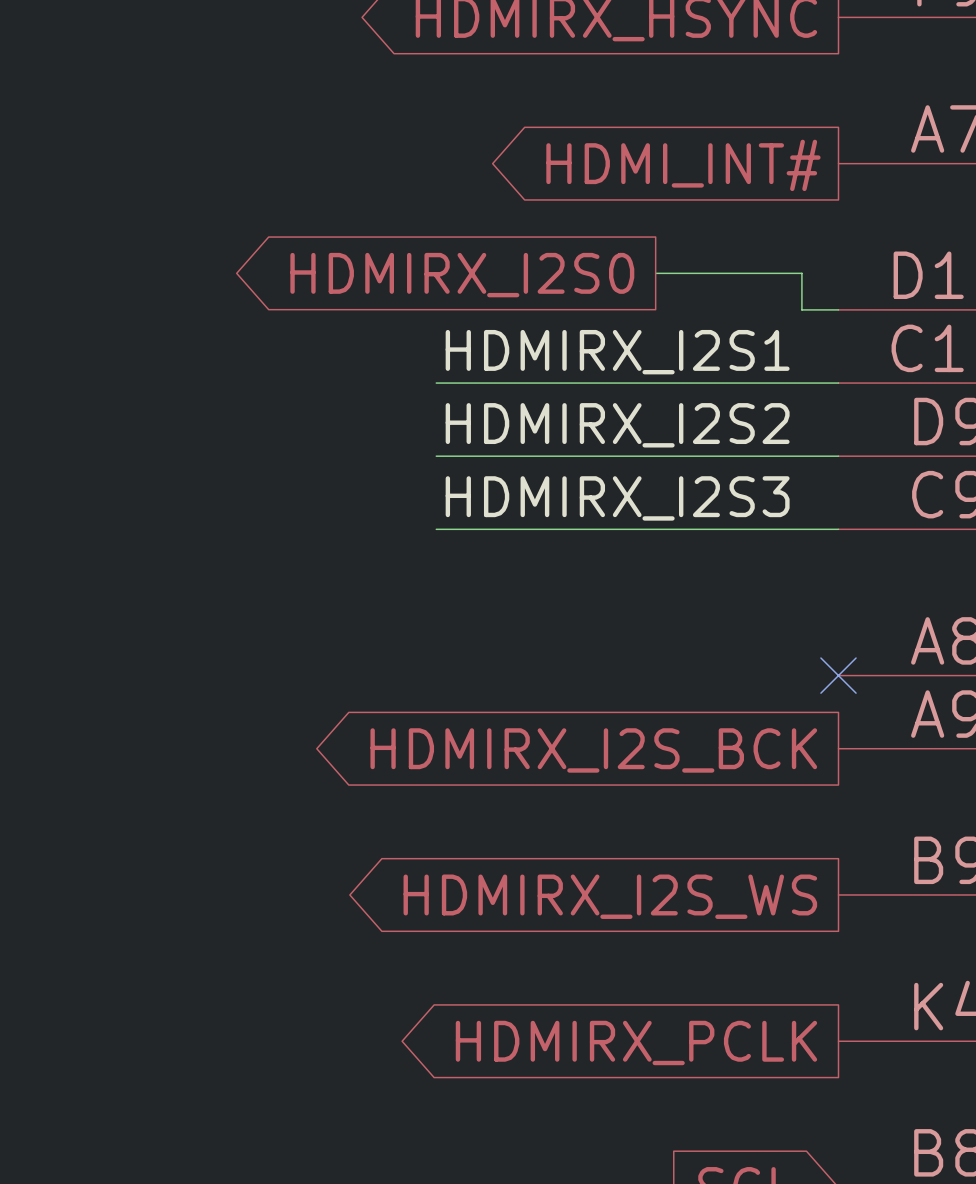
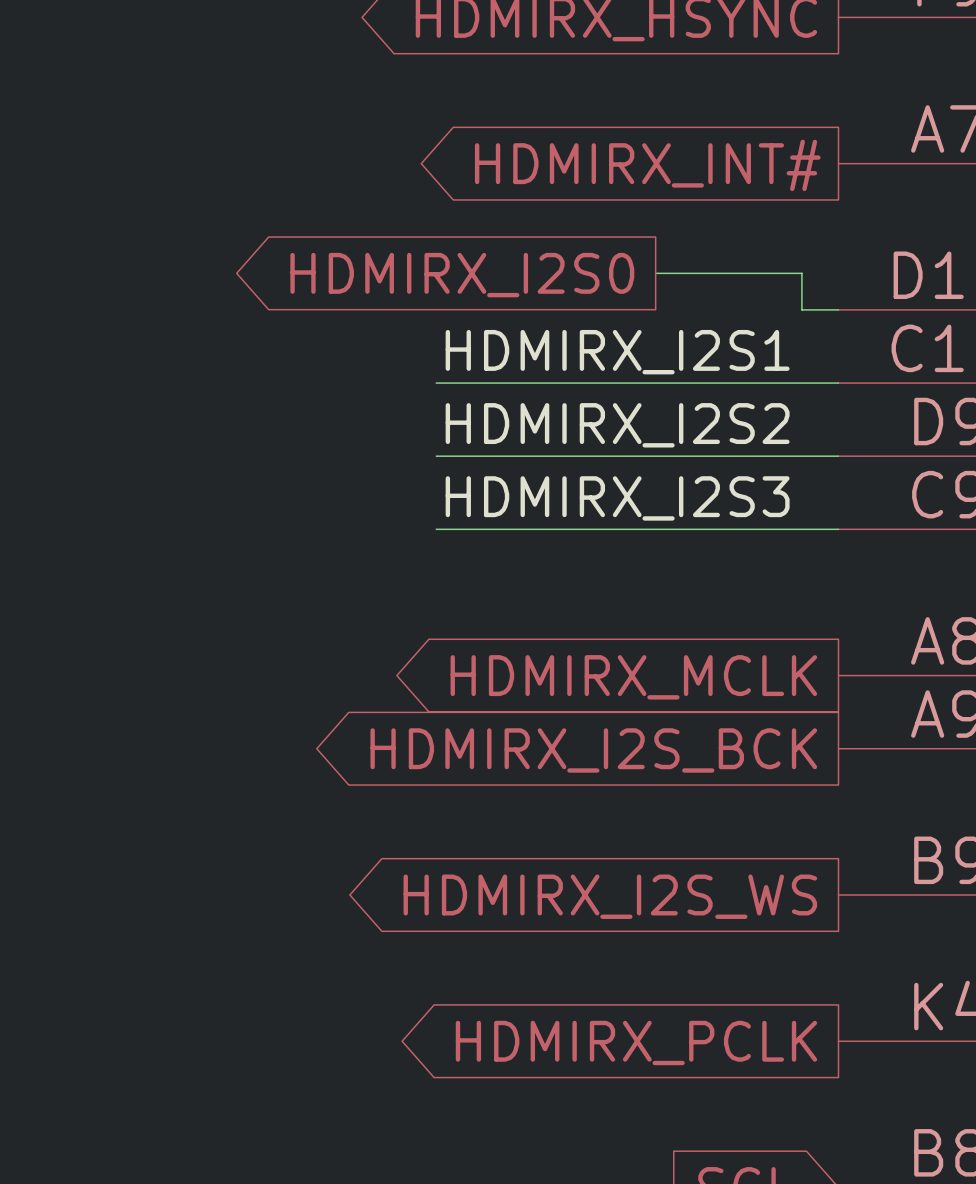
global label: HDMI_INT# (683, 165) -> HDMIRX_INT# (647, 165)
no-connect mark: (838, 675) -> none
global label: none -> HDMIRX_MCLK (633, 677)

